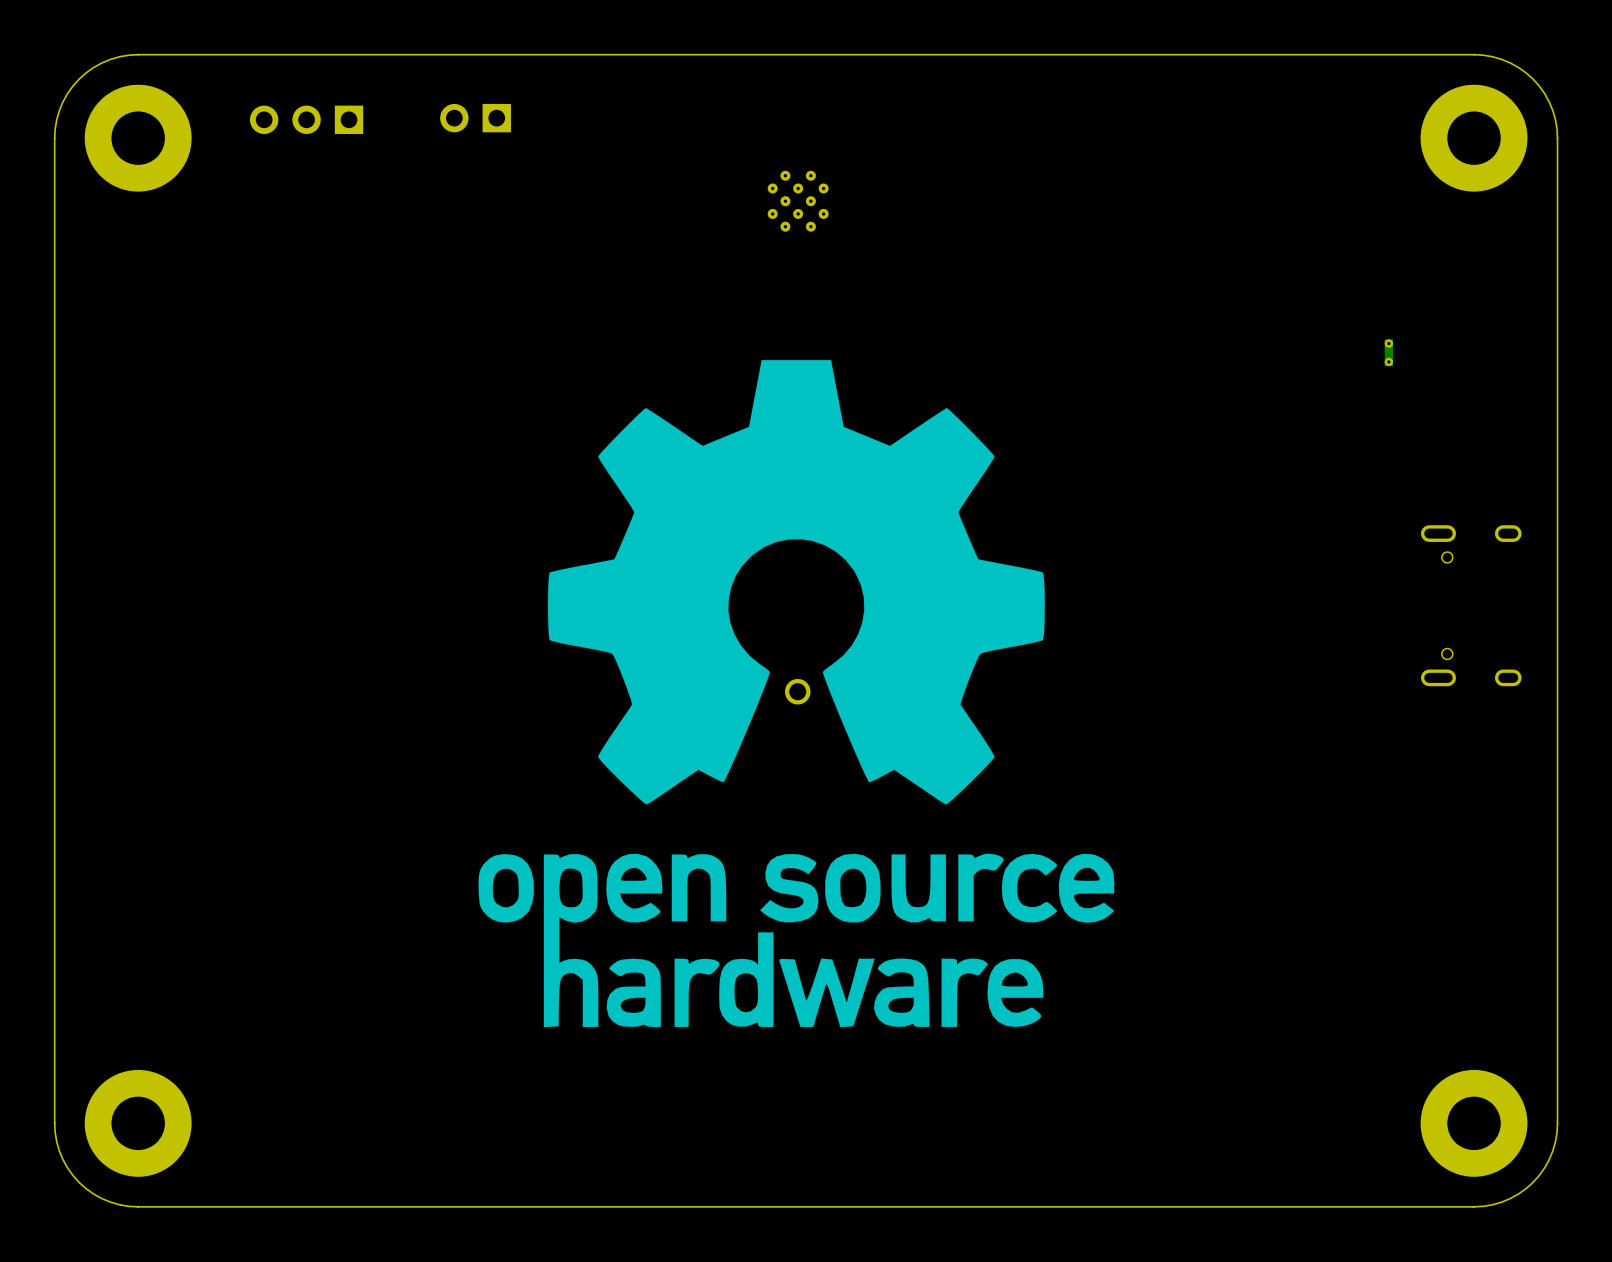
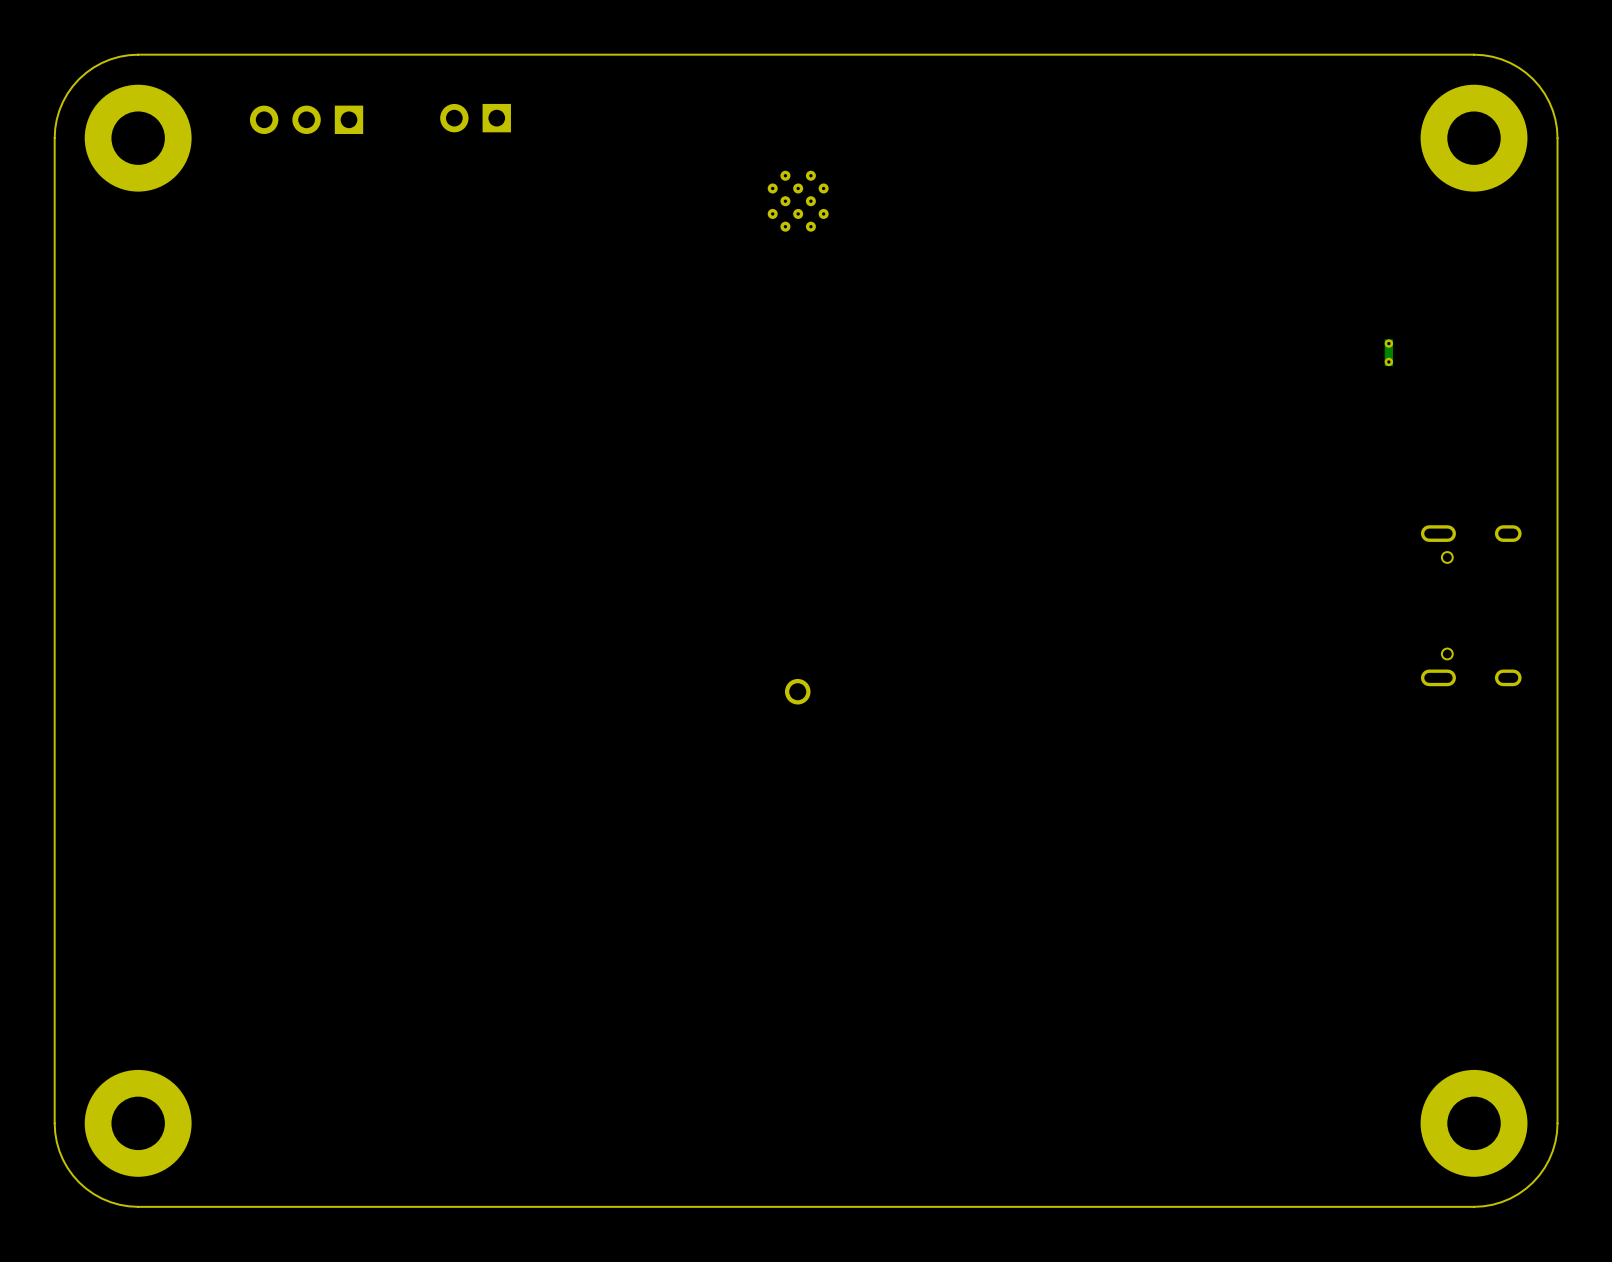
drawing: [478, 360, 1115, 1028] -> none

